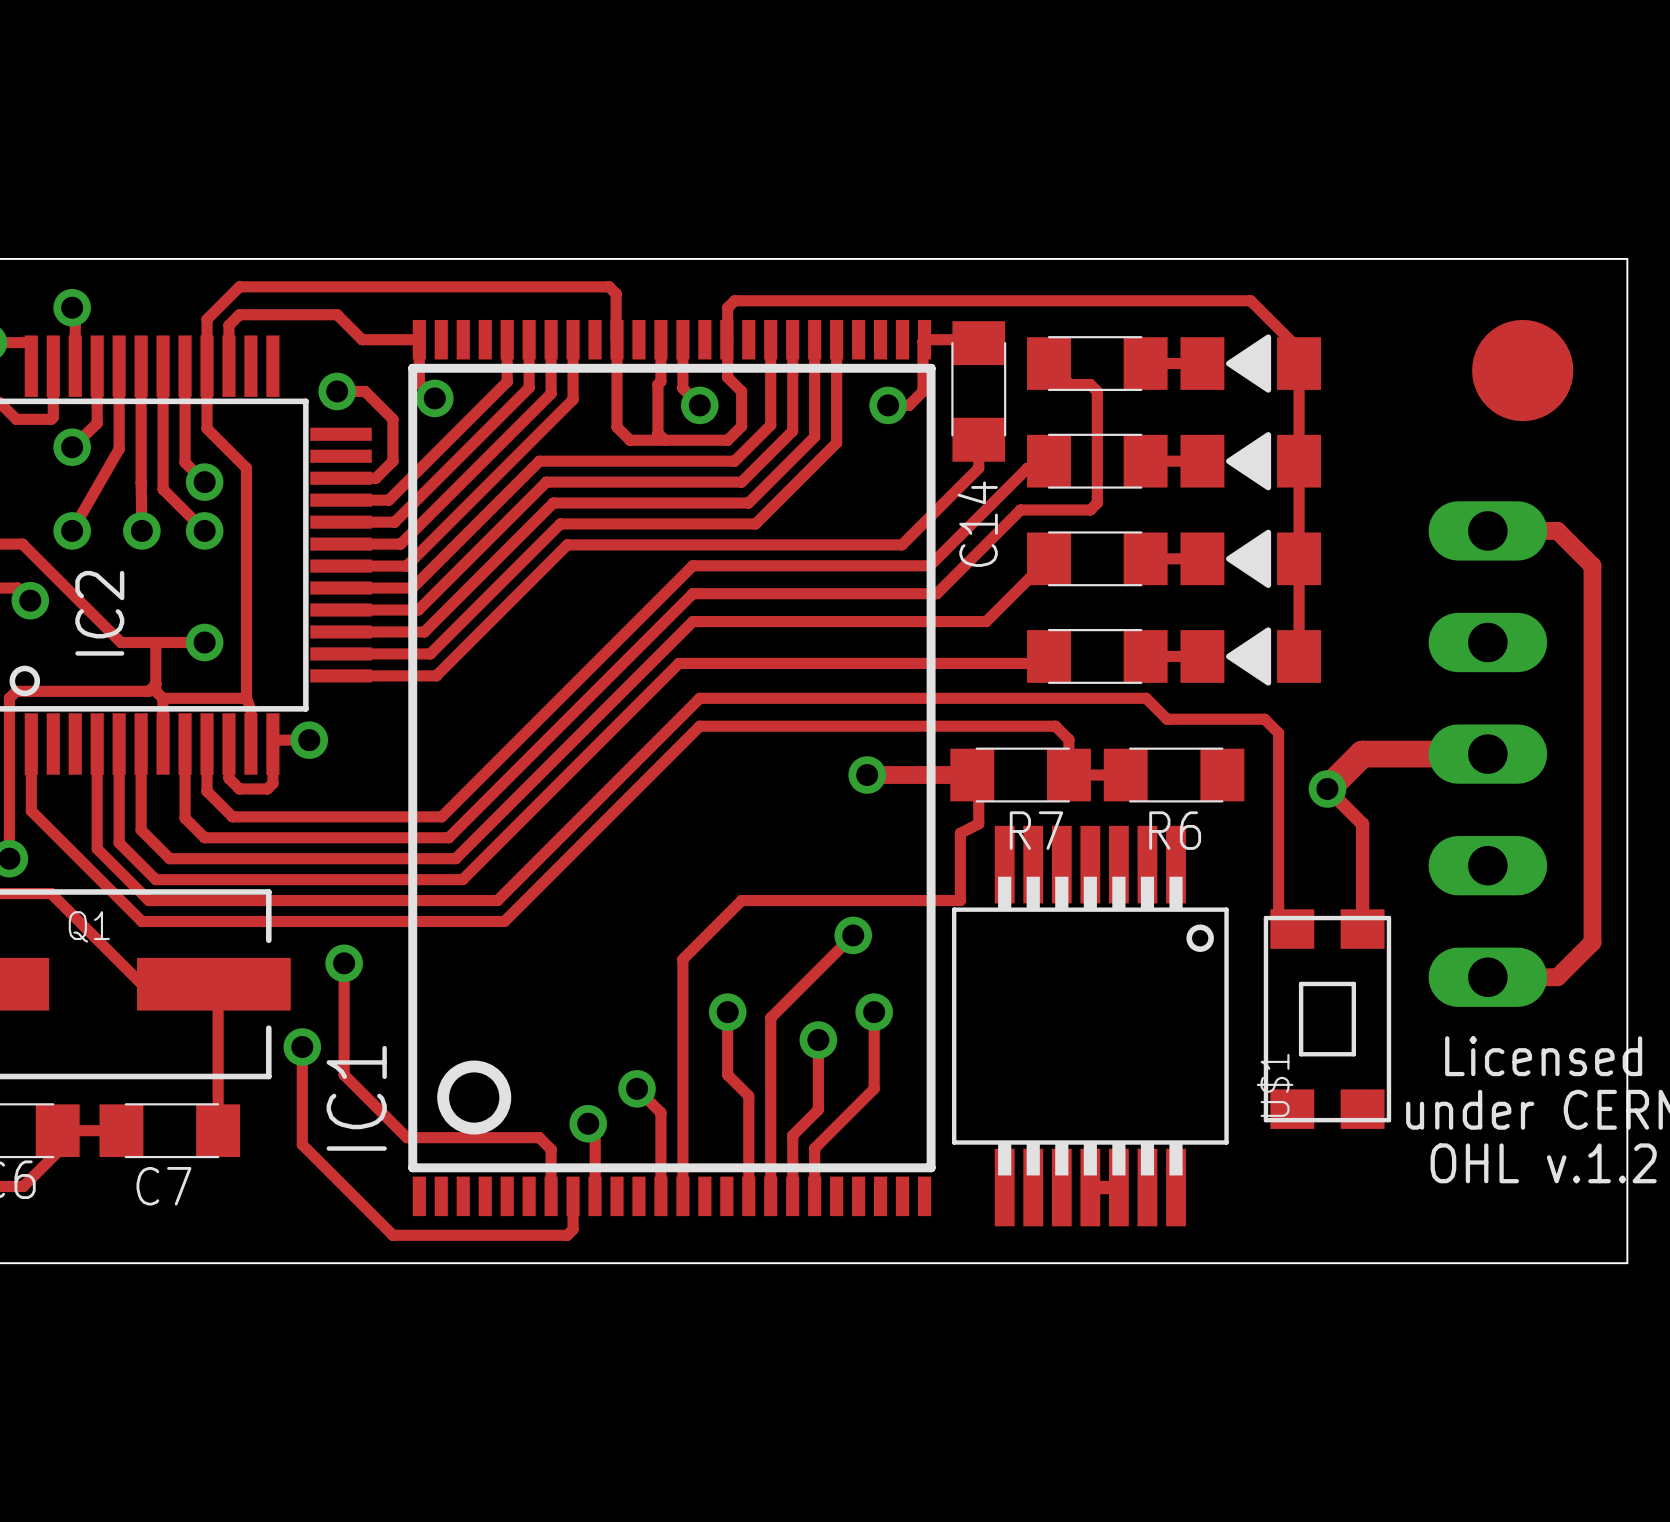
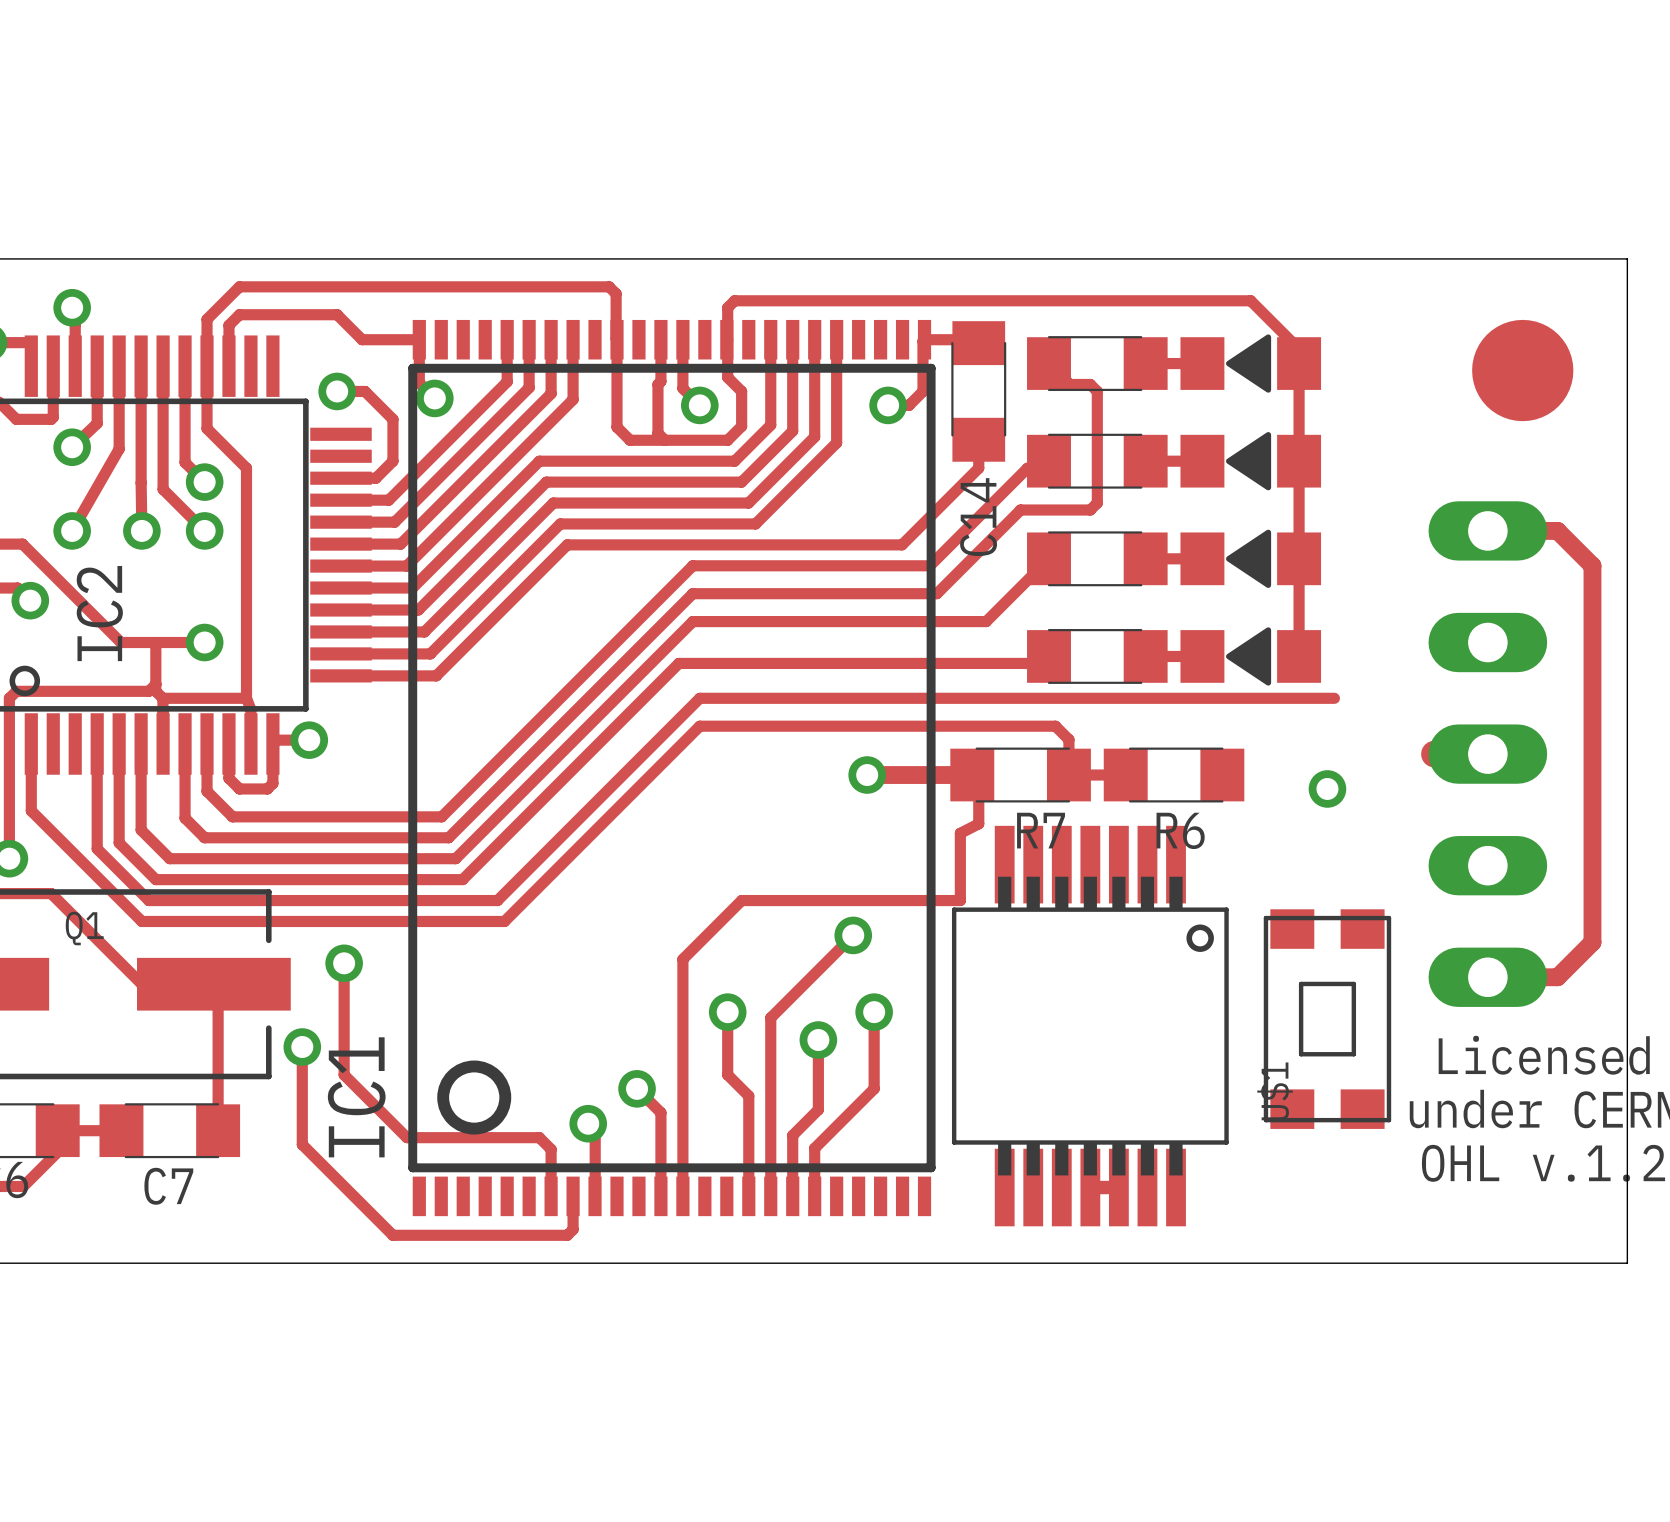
track: (1146, 698) (1167, 719) (1264, 719) (1278, 733) (1278, 915) (1292, 929) -> (1146, 698) (1334, 698)
track: (1434, 754) (1362, 754) (1327, 788) (1362, 824) (1362, 929) -> none

